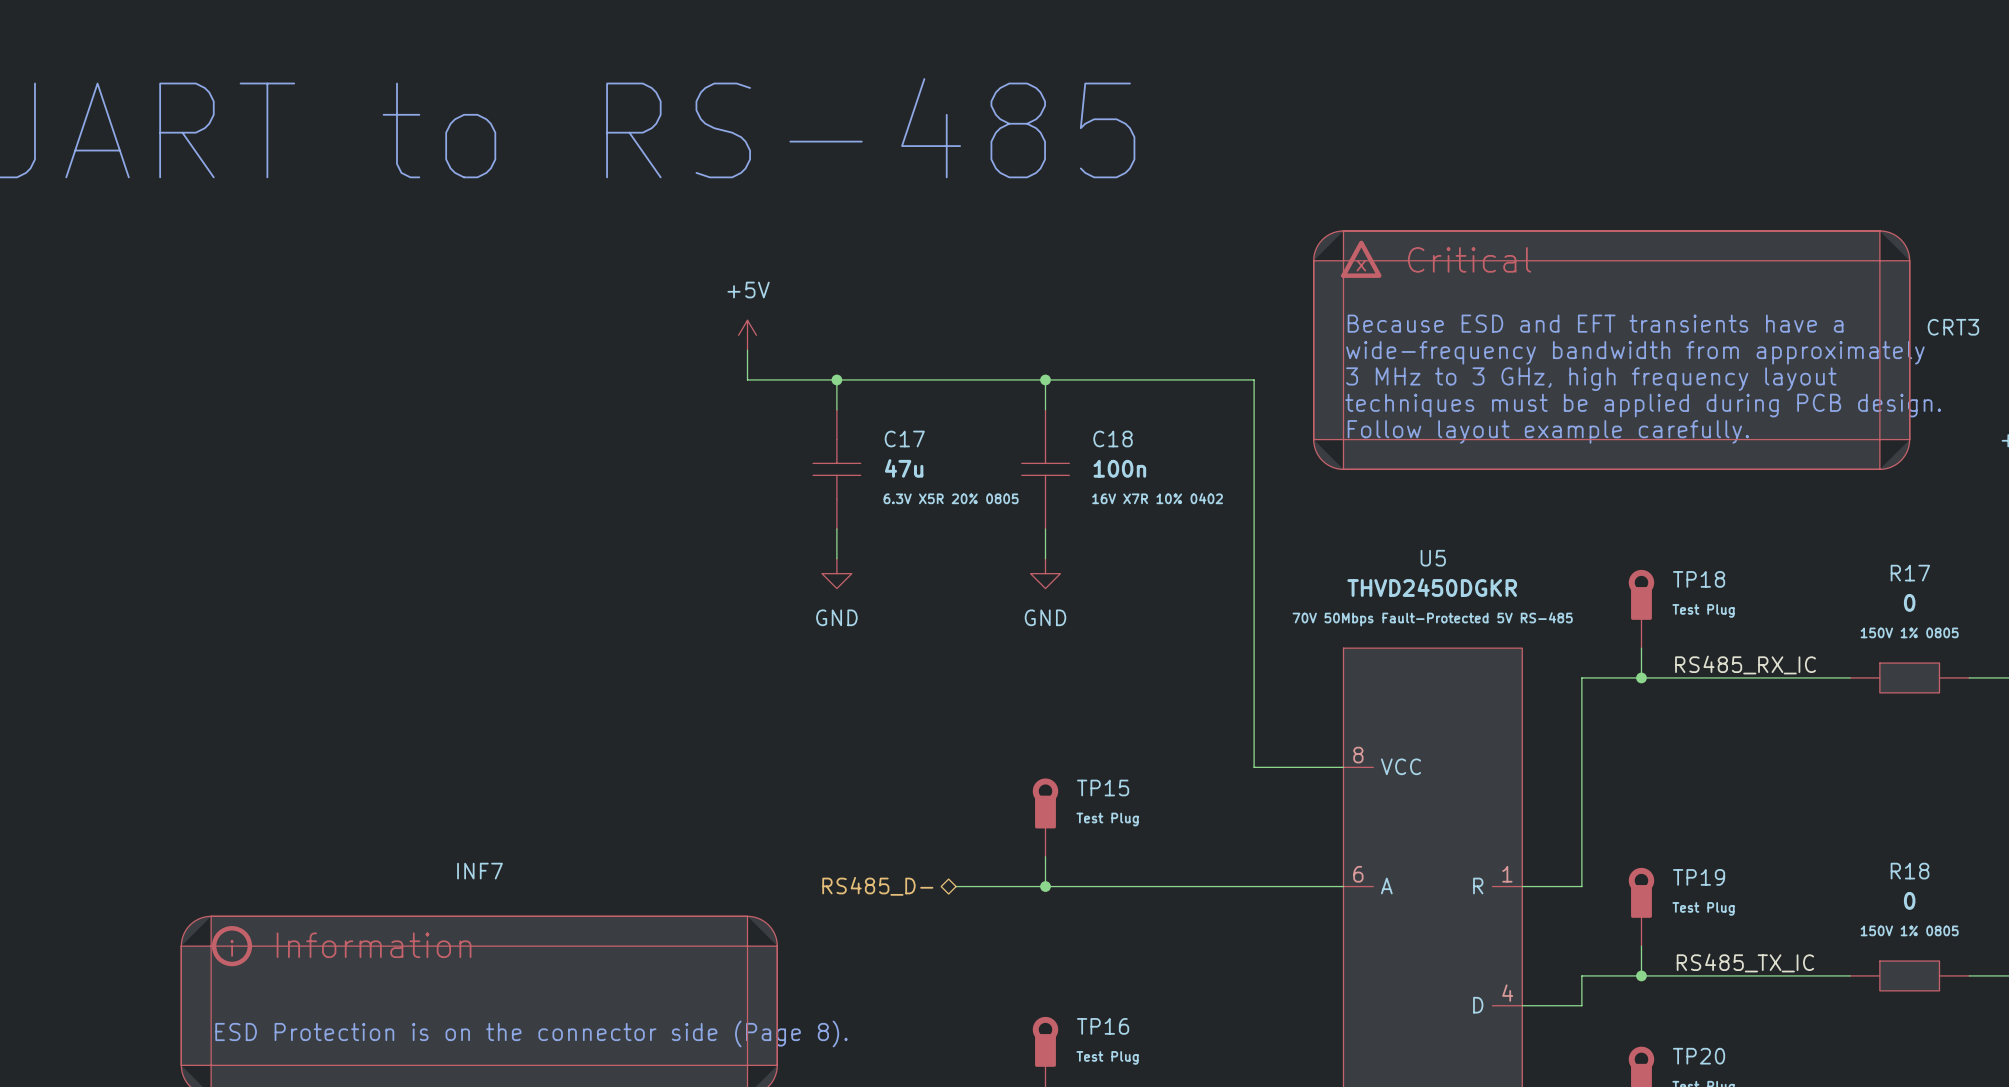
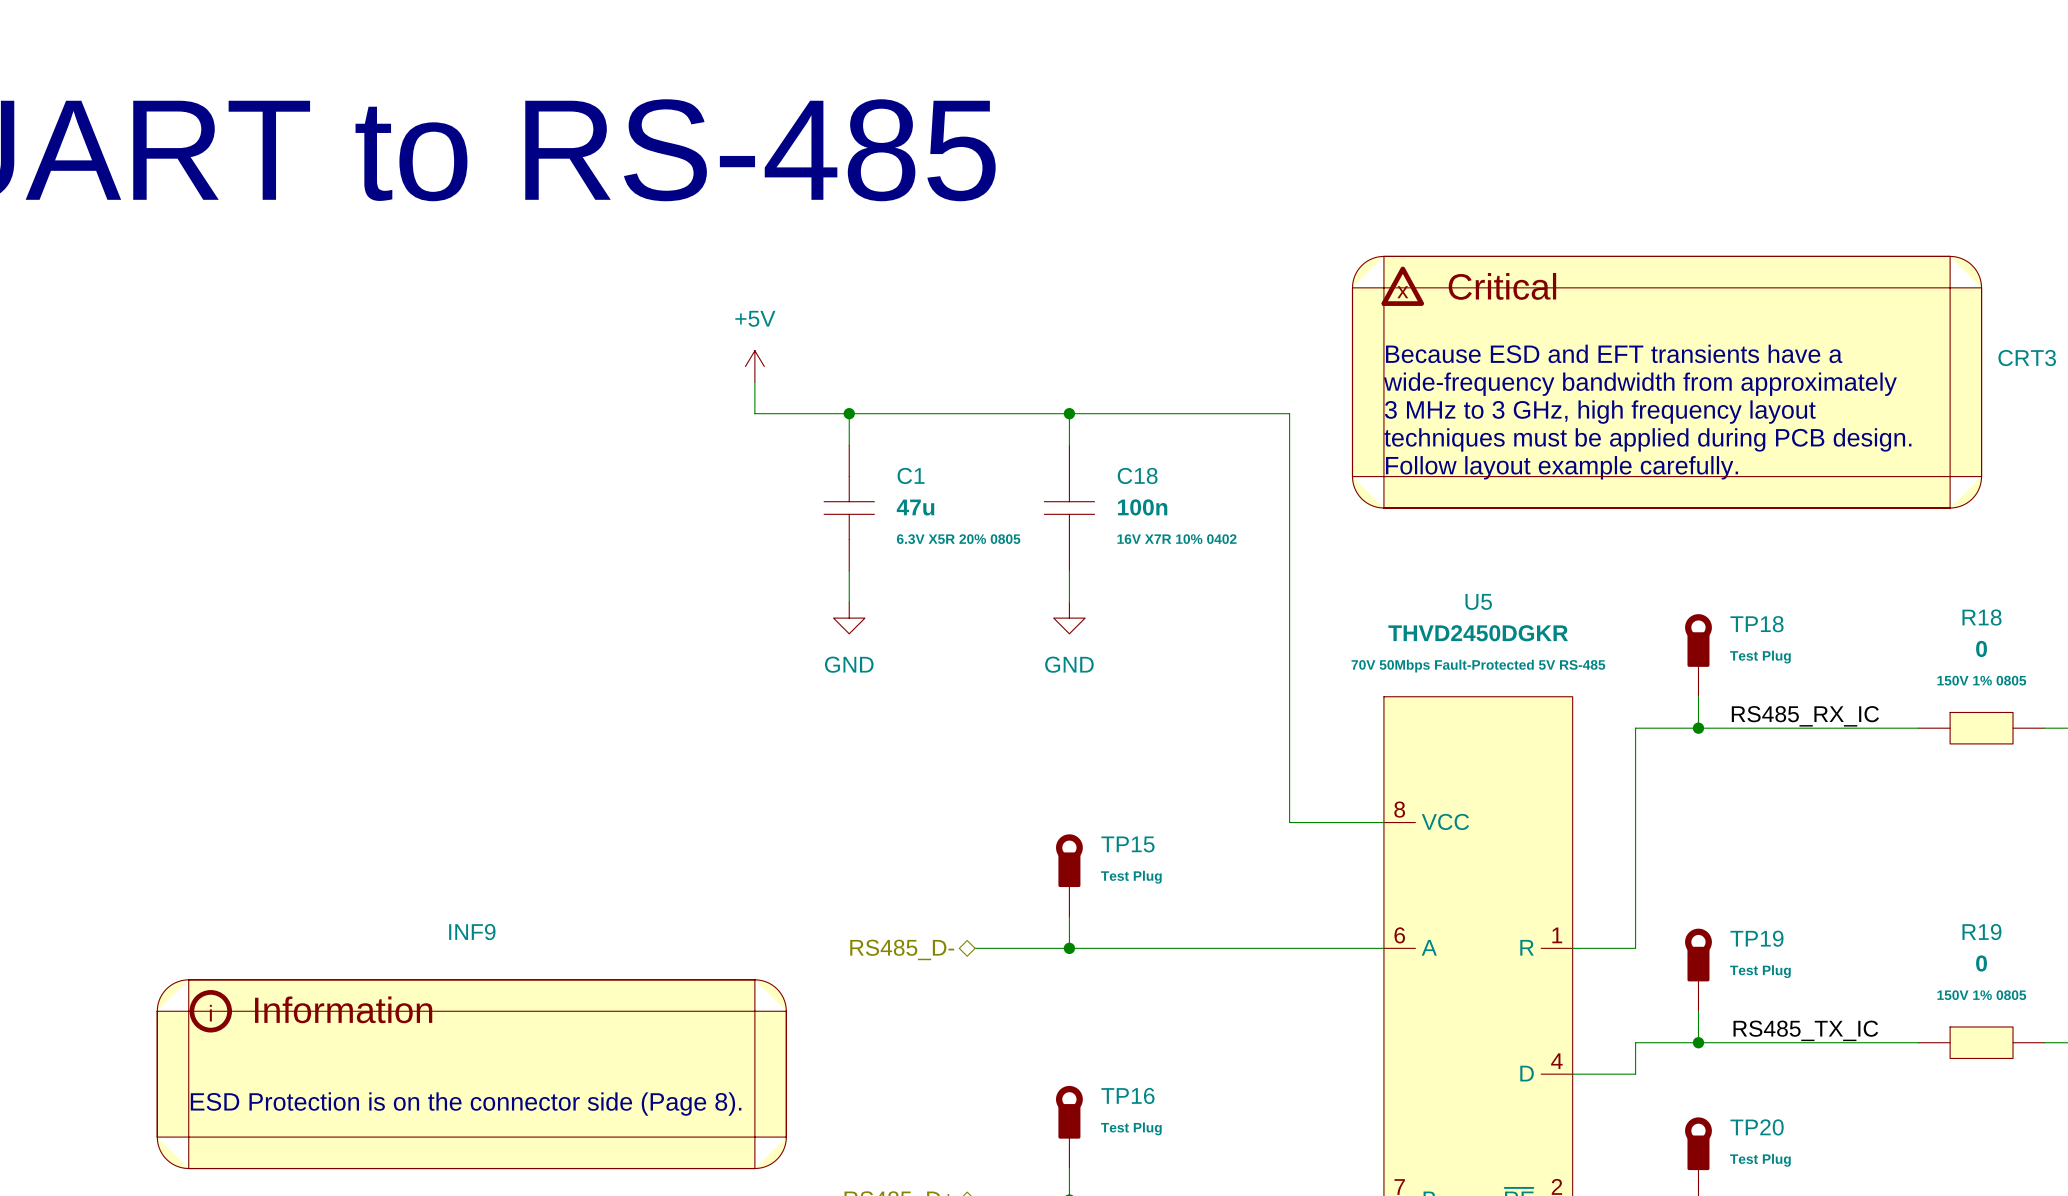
C17 name: C17 (904, 439) -> C1 (911, 475)
R17 name: R17 (1910, 573) -> R18 (1982, 617)
INF7 name: INF7 (480, 871) -> INF9 (472, 932)
R18 name: R18 (1910, 871) -> R19 (1981, 932)

